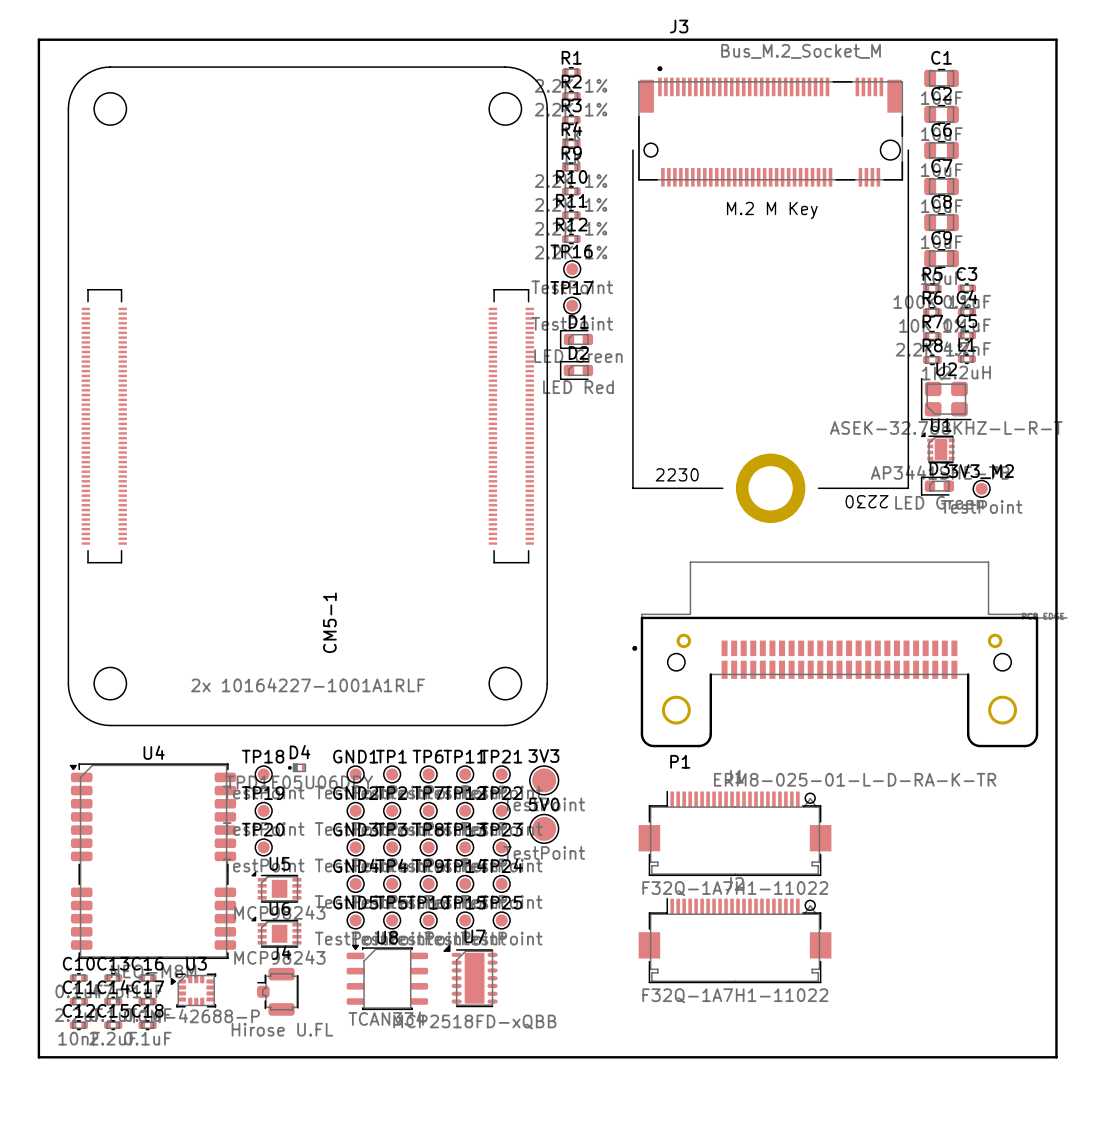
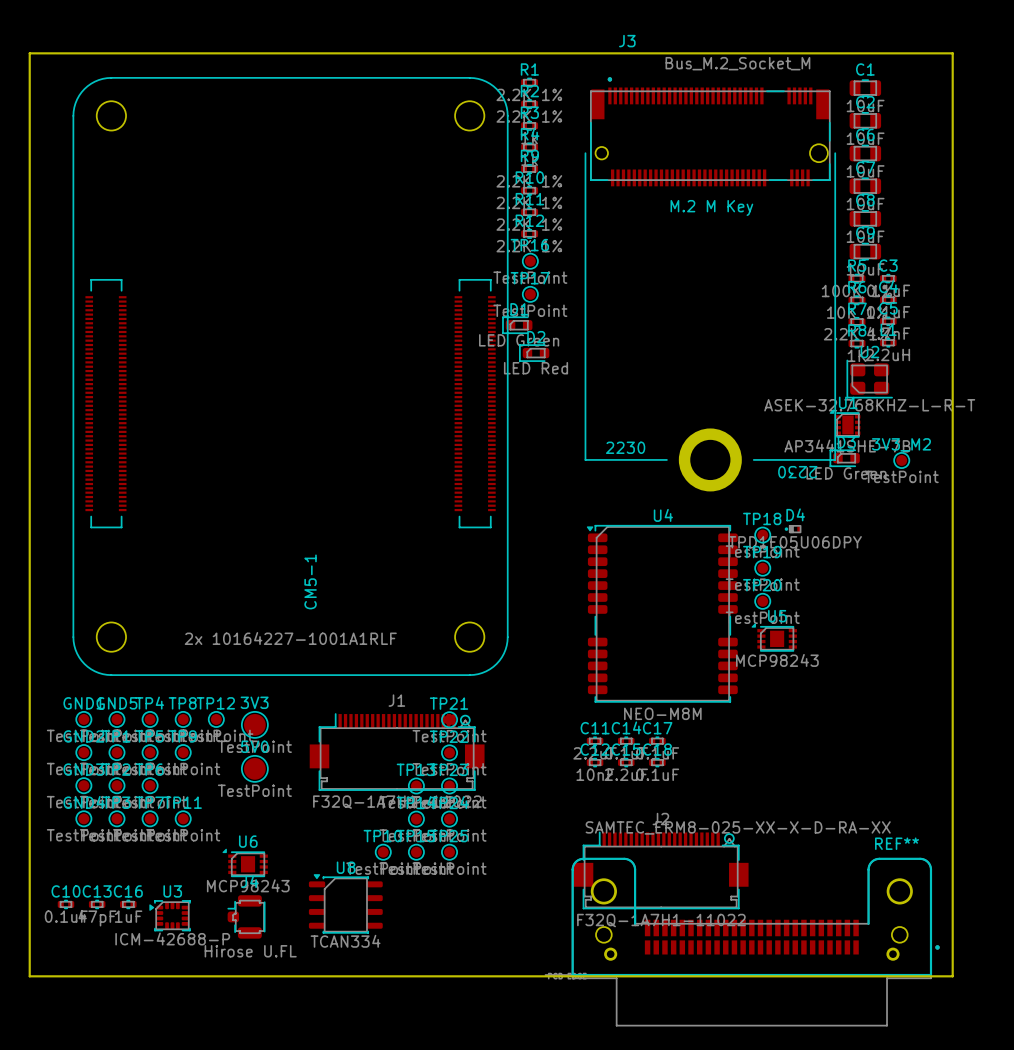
R1 position: (571, 72) -> (529, 82)
C1 position: (941, 78) -> (865, 88)
R2 position: (571, 96) -> (529, 104)
C2 position: (941, 114) -> (865, 120)
R3 position: (571, 119) -> (529, 125)
R4 position: (571, 143) -> (529, 147)
C6 position: (941, 150) -> (865, 153)
R9 position: (571, 167) -> (529, 169)
C7 position: (941, 186) -> (865, 186)
R10 position: (571, 191) -> (529, 190)
R11 position: (571, 215) -> (529, 212)
C8 position: (941, 222) -> (865, 218)
R12 position: (571, 239) -> (529, 233)
C9 position: (941, 258) -> (865, 251)
TP16 position: (572, 269) -> (530, 261)
R5 position: (932, 288) -> (856, 278)
C3 position: (966, 288) -> (888, 278)
J3 position: (770, 294) -> (710, 284)
TP17 position: (572, 305) -> (530, 294)
C4 position: (966, 311) -> (888, 300)
R6 position: (932, 312) -> (856, 300)
C5 position: (966, 335) -> (888, 321)
R7 position: (932, 336) -> (856, 321)
R8 position: (932, 359) -> (856, 343)
L1 position: (966, 359) -> (888, 342)
D2 position: (576, 370) -> (534, 353)
CM5-1 position: (307, 396) -> (290, 376)
U2 position: (946, 399) -> (869, 379)
3V3_M2 position: (981, 488) -> (901, 460)
P1: ERM8-025-01-L-D-RA-K-TR (849, 654) -> none
D4 position: (296, 767) -> (792, 529)
TP18 position: (263, 774) -> (762, 535)
GND1 position: (355, 774) -> (83, 719)
TP1 position: (392, 774) -> (116, 752)
TP6 position: (428, 774) -> (150, 785)
TP11 position: (465, 774) -> (183, 818)
3V3 position: (544, 780) -> (254, 724)
TP19 position: (263, 810) -> (762, 568)
GND2 position: (355, 810) -> (83, 752)
TP2 position: (392, 810) -> (116, 785)
TP7 position: (428, 810) -> (150, 818)
TP12 position: (465, 810) -> (216, 719)
5V0 position: (544, 828) -> (254, 768)
J1 position: (735, 833) -> (397, 752)
TP20 position: (263, 847) -> (762, 601)
GND3 position: (355, 847) -> (83, 785)
TP3 position: (392, 847) -> (116, 818)
TP8 position: (428, 847) -> (183, 719)
U4 position: (152, 861) -> (662, 613)
GND4 position: (355, 883) -> (83, 818)
TP4 position: (392, 883) -> (150, 719)
TP9 position: (428, 883) -> (183, 752)
U5 position: (276, 887) -> (774, 637)
GND5 position: (355, 920) -> (116, 719)
TP5 position: (392, 920) -> (150, 752)
U7: MCP2518FD-xQBB (470, 975) -> none
C11 position: (78, 1001) -> (595, 741)
C14 position: (113, 1001) -> (626, 741)
C17 position: (147, 1001) -> (657, 741)
REF**: none -> SAMTEC_ERM8-025-XX-X-D-RA-XX (742, 941)
C12 position: (78, 1025) -> (595, 762)
C15 position: (113, 1025) -> (626, 762)
C18 position: (147, 1025) -> (657, 762)

